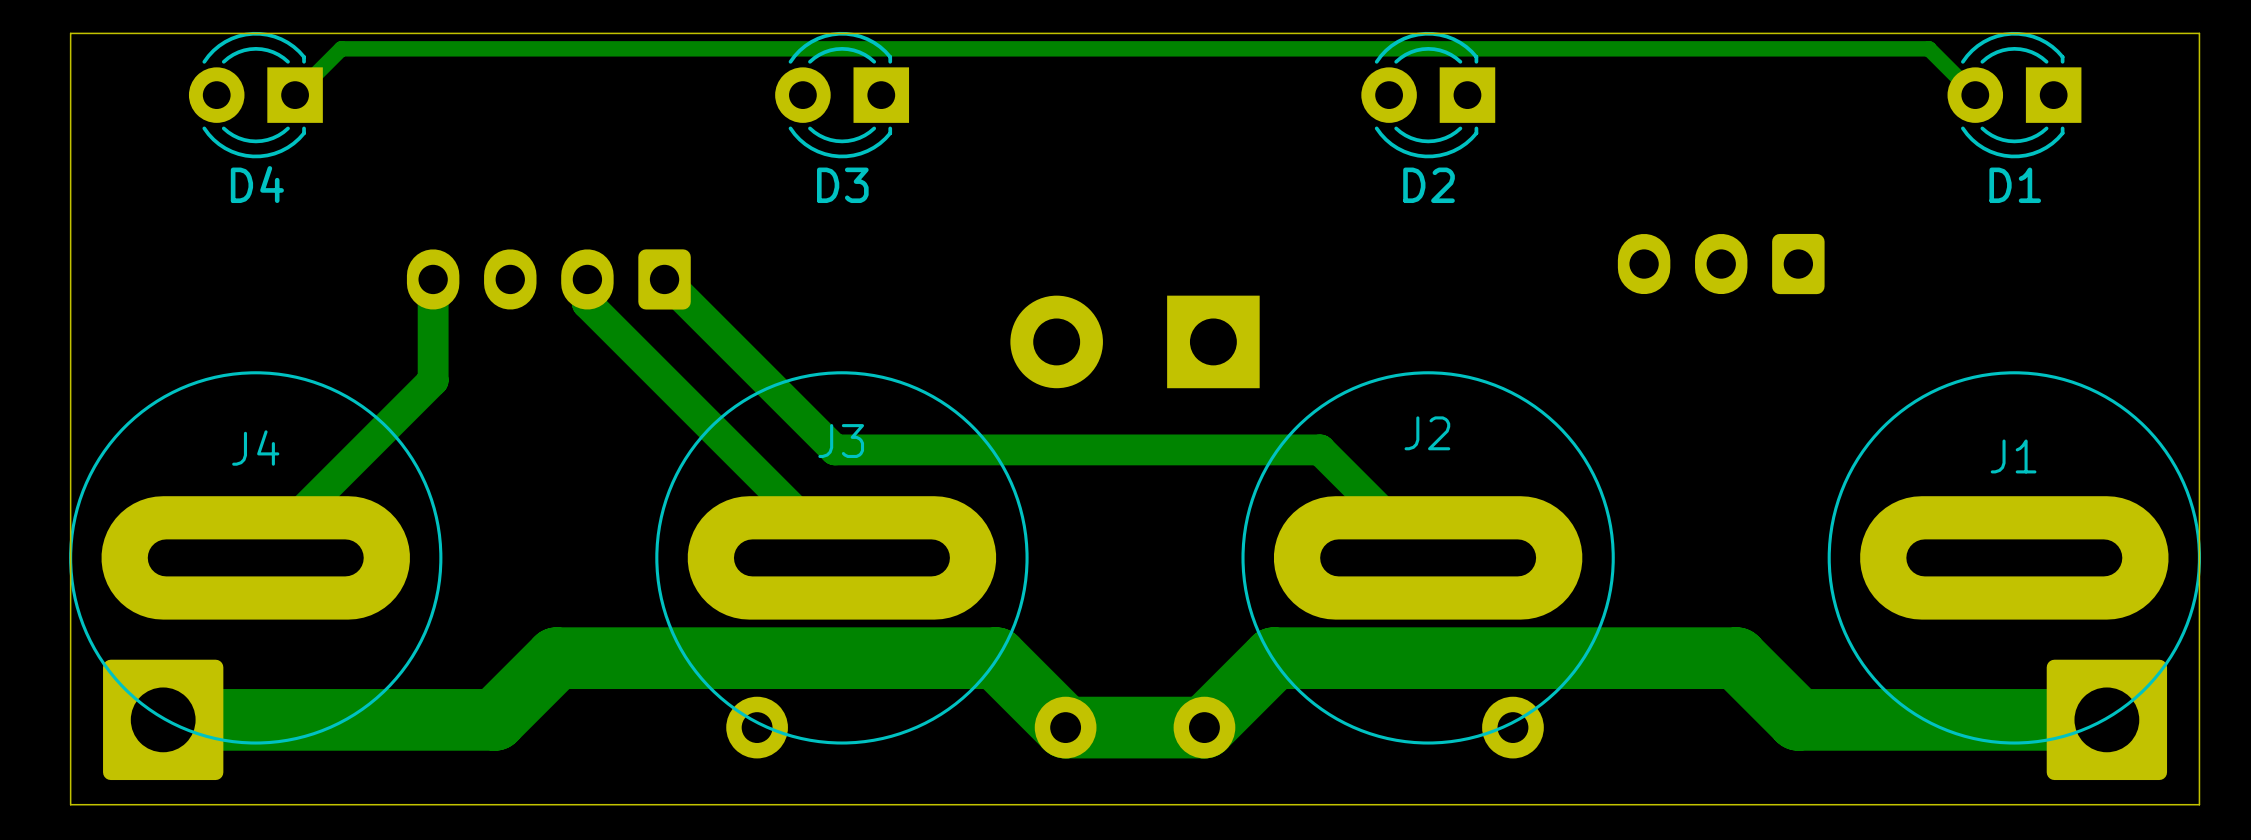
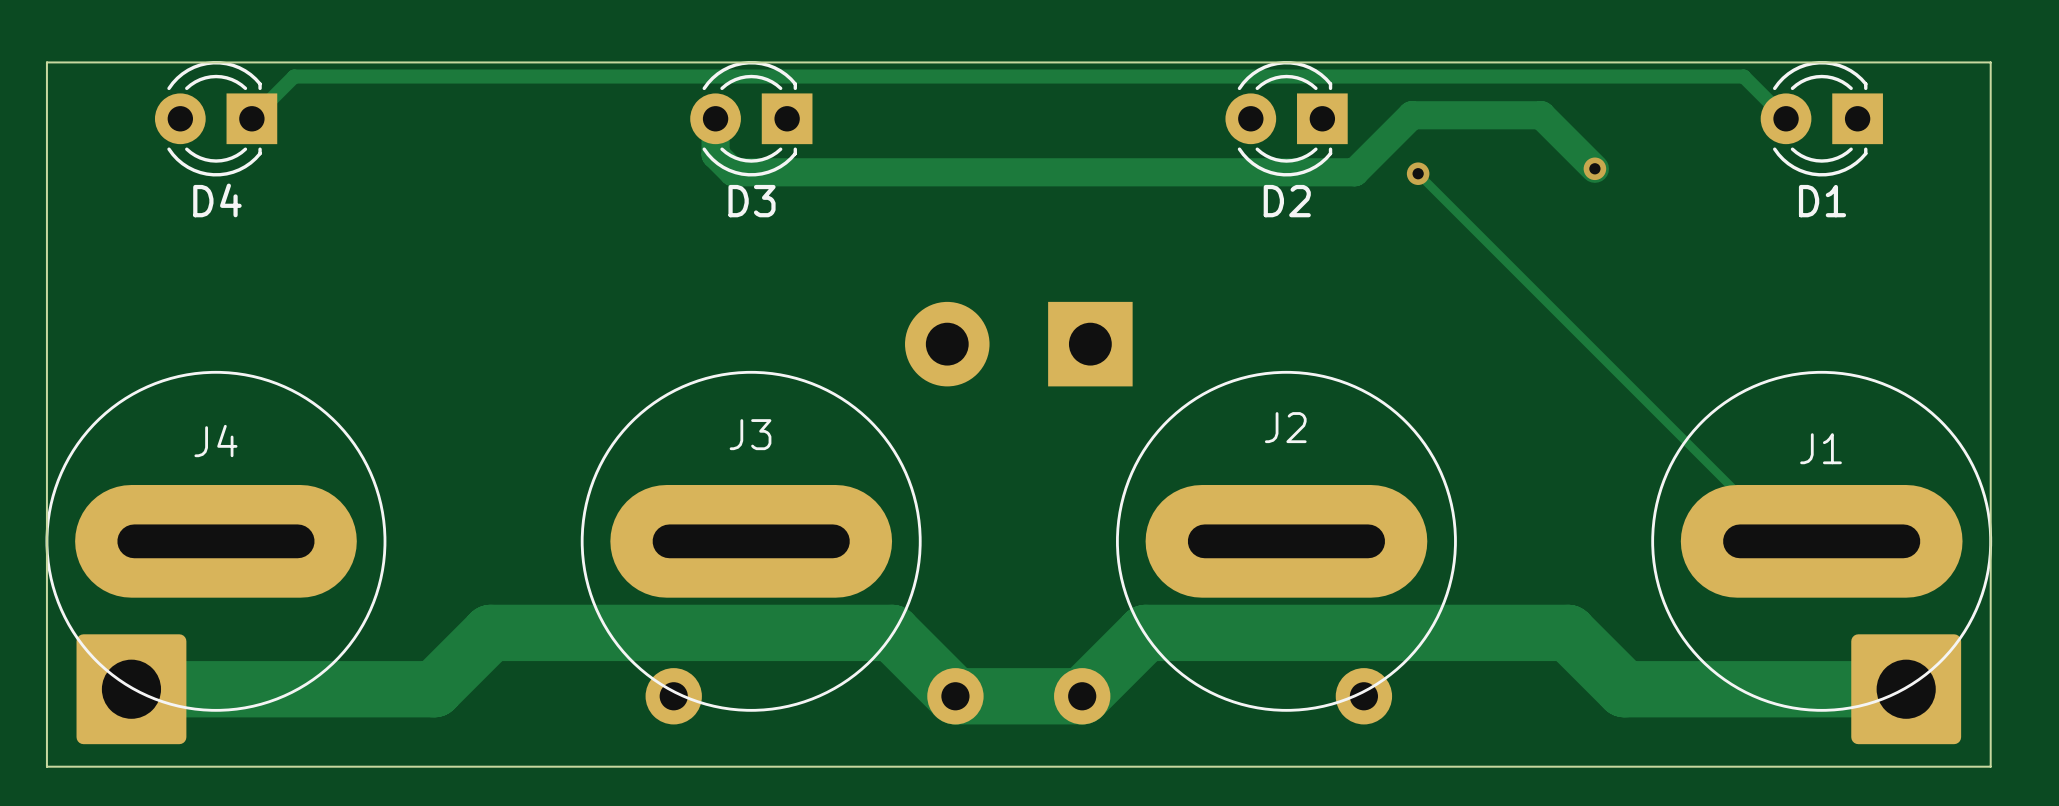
track: none -> (715, 118) (715, 154) (733, 172) (1354, 172) (1411, 115) (1541, 115) (1594, 168)
via: none -> (1594, 168)
track: none -> (1418, 173) (1785, 541) (1821, 541)
via: none -> (1418, 173)
part: (1721, 264) -> none
track: (433, 279) (433, 380) (255, 557) -> none
part: (548, 279) -> none
track: (587, 279) (587, 303) (841, 557) -> none
track: (664, 279) (835, 449) (1320, 449) (1428, 557) -> none

